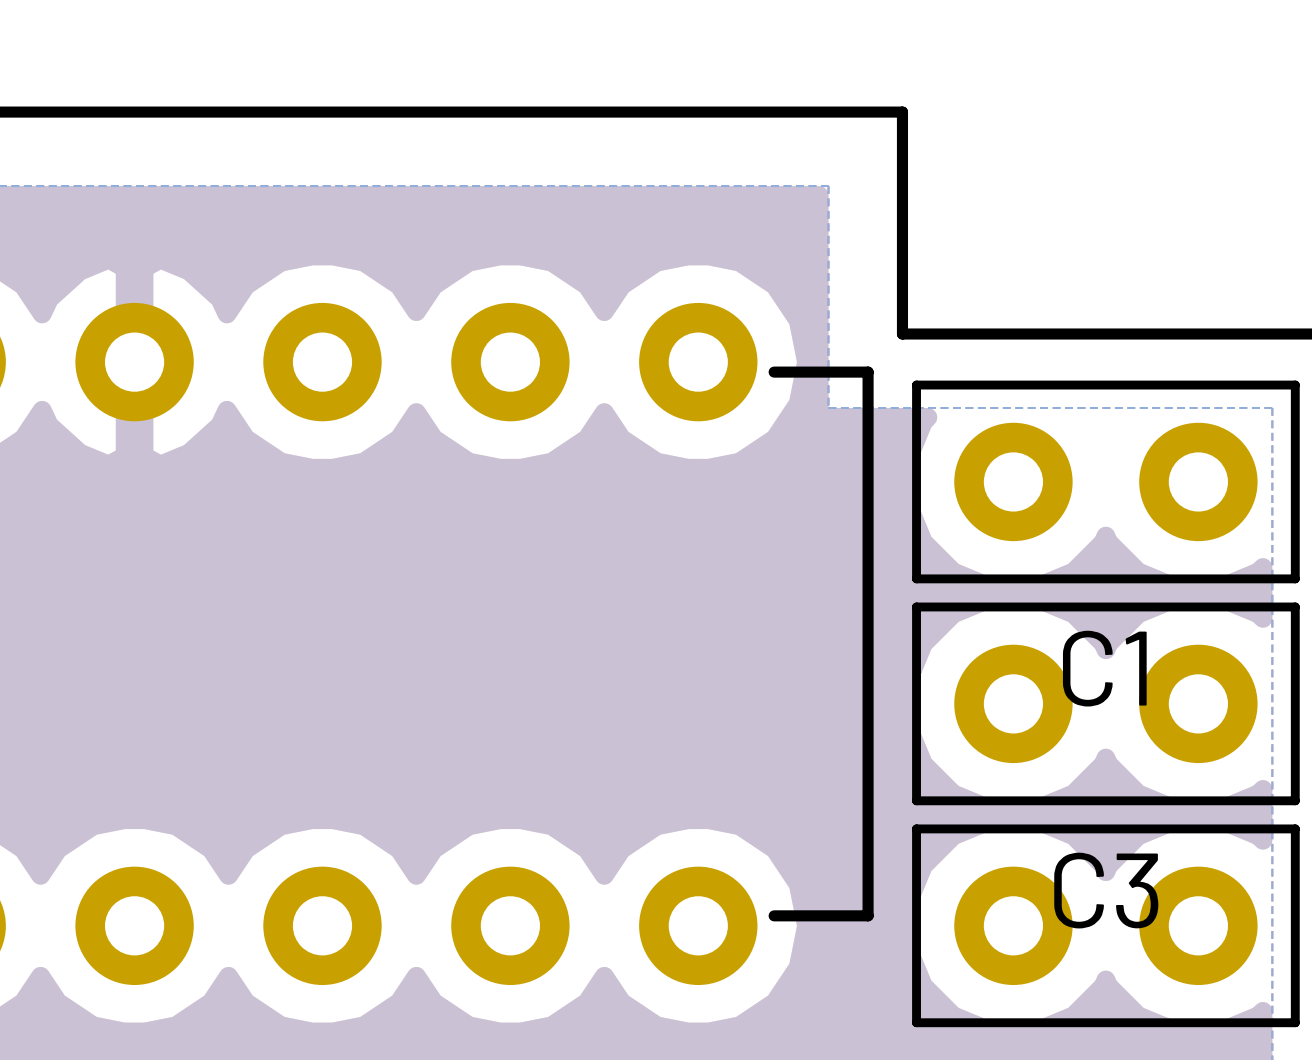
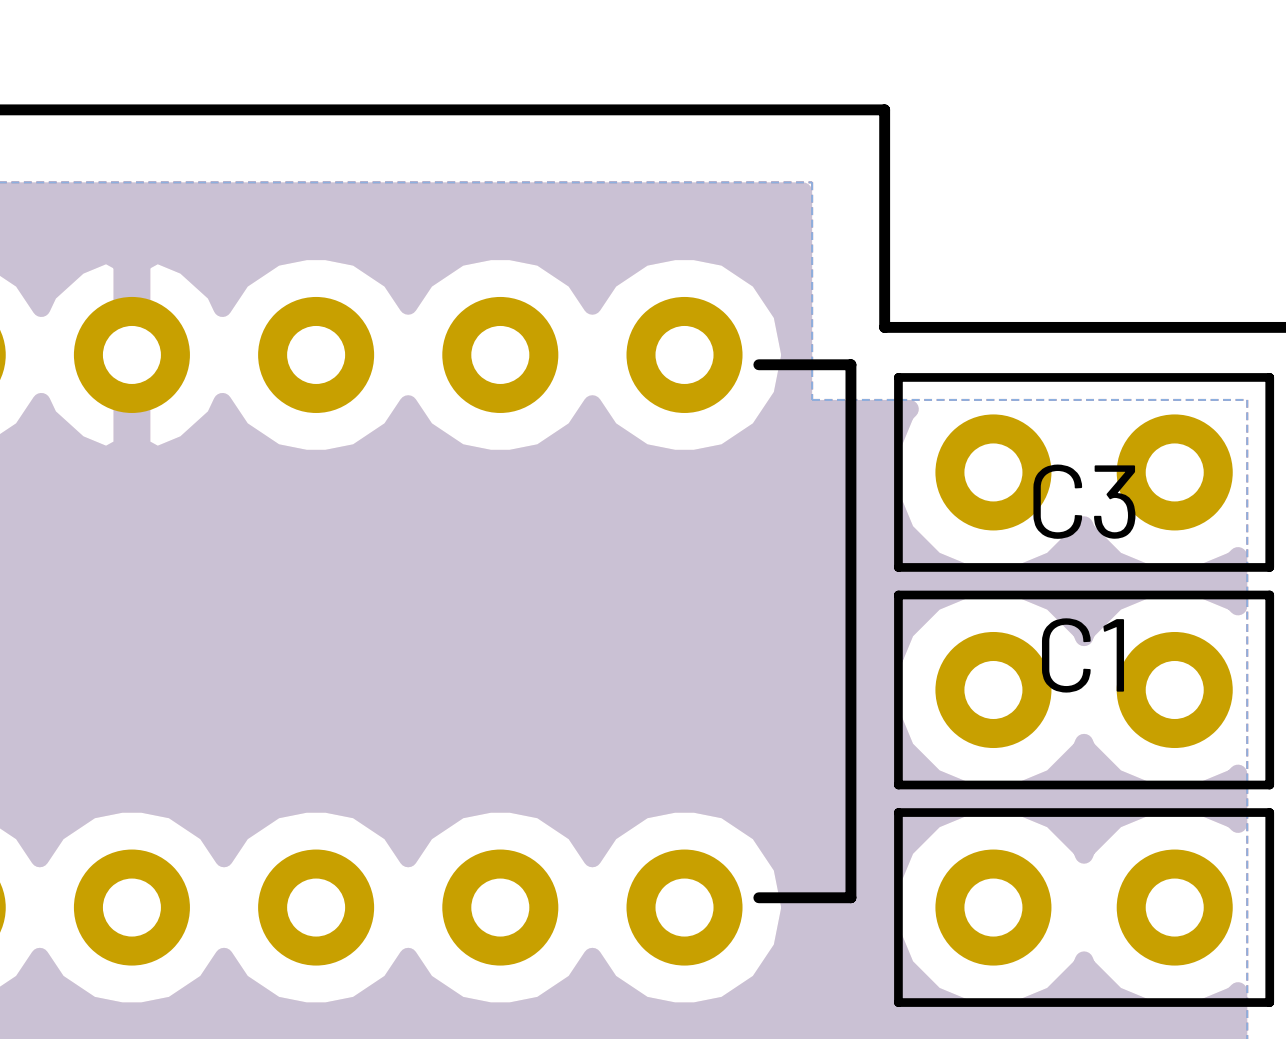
C3 name position: C3 (1106, 890) -> C3 (1084, 501)

